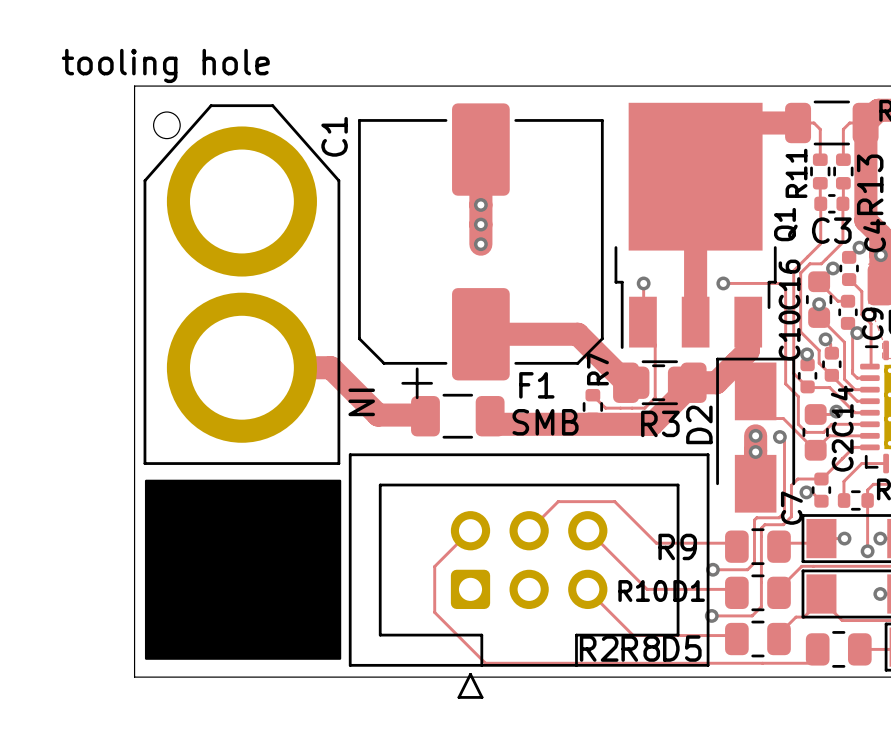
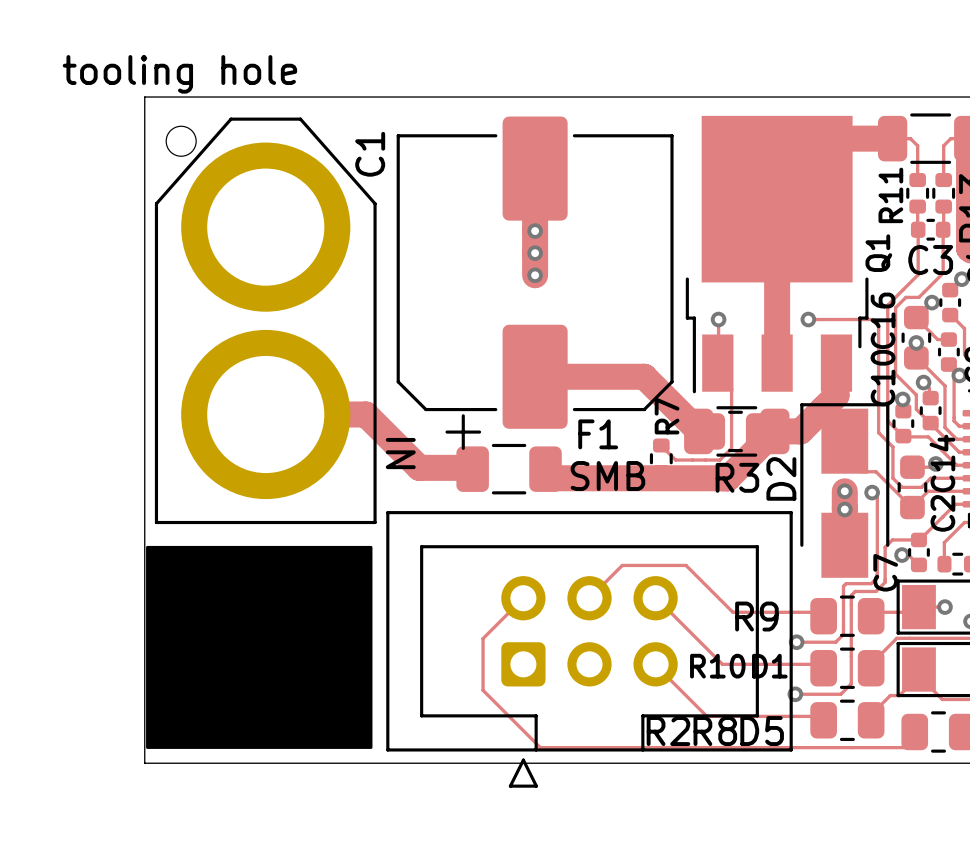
drawing shape: [144, 479, 342, 660] -> [146, 545, 373, 749]

